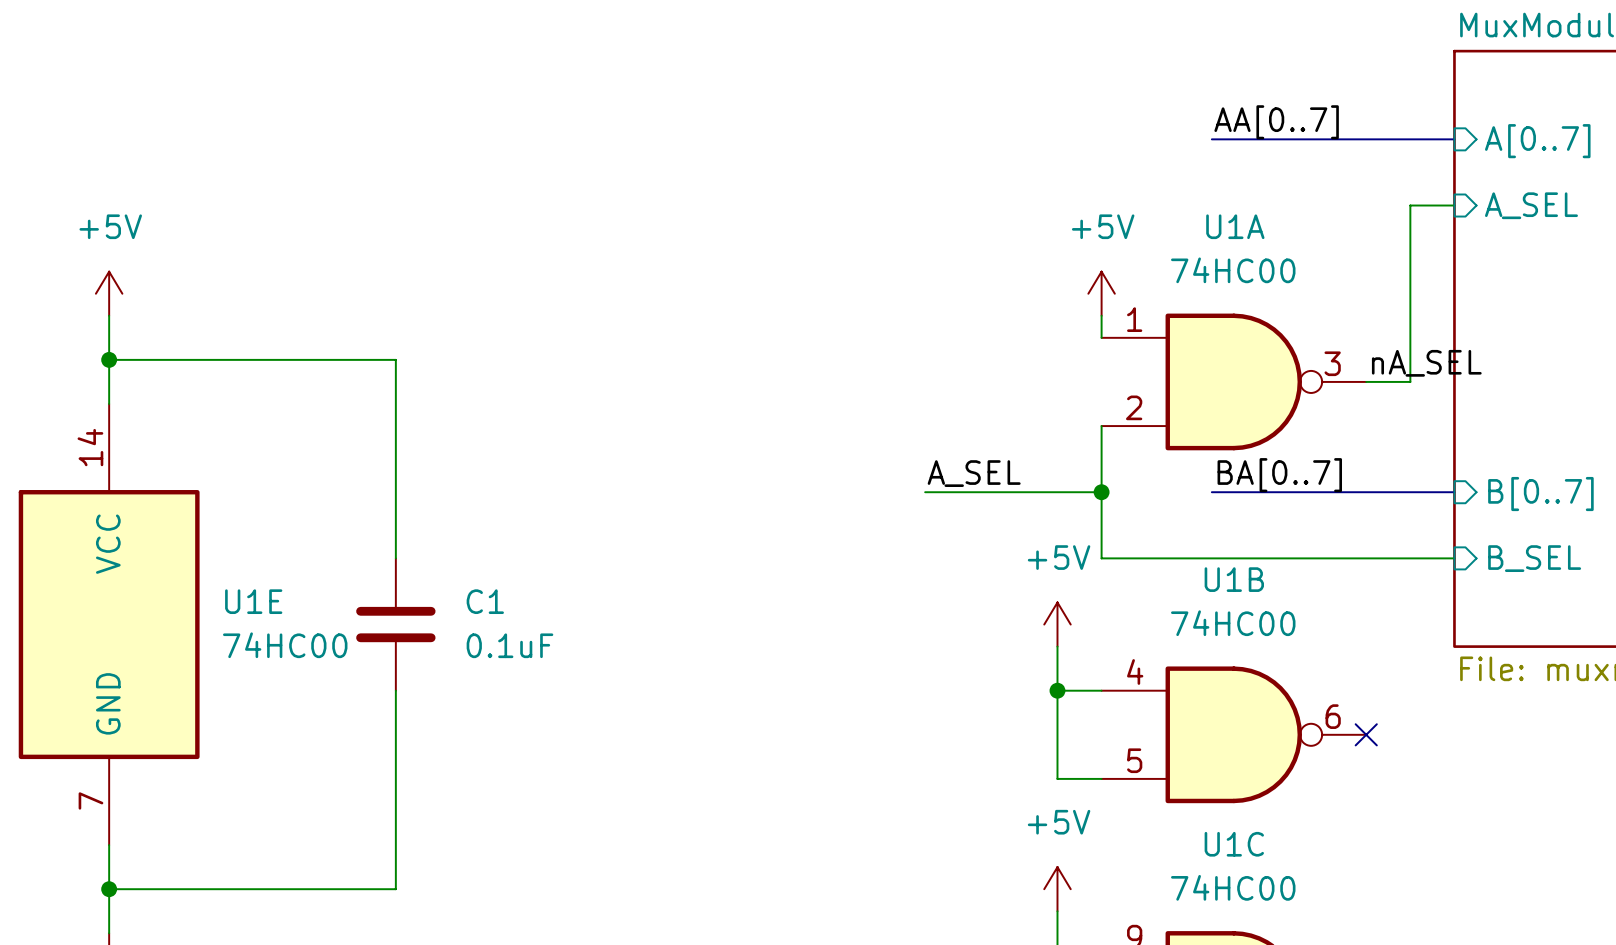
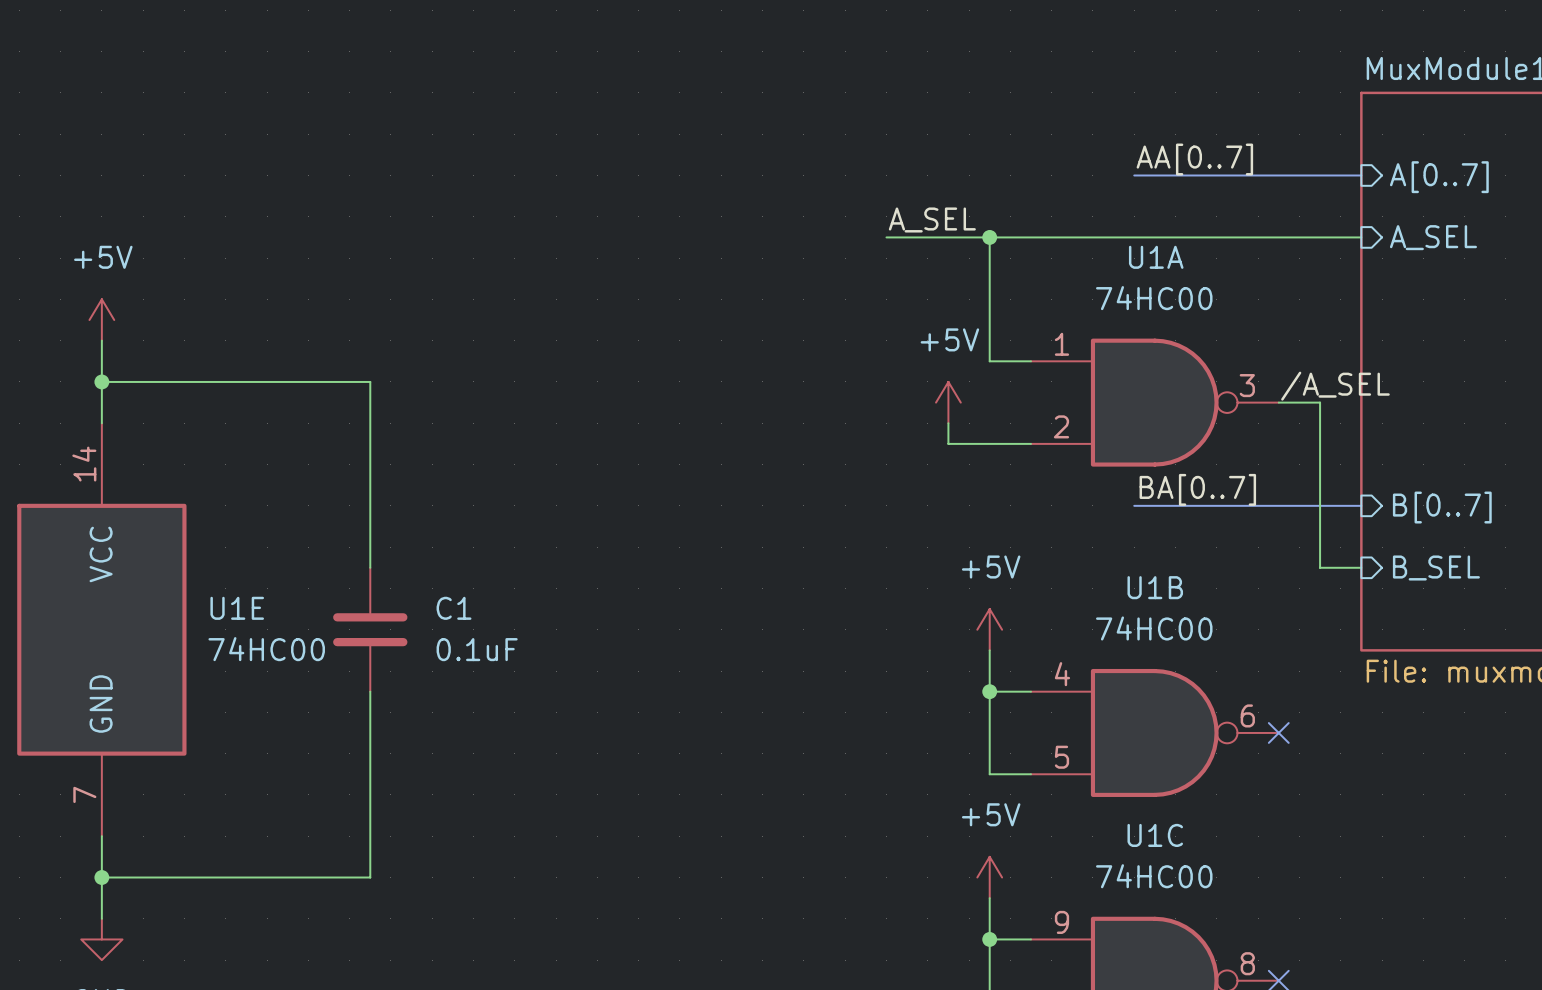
junction: none -> (989, 237)
wire: (1410, 205) (1410, 381) -> (1320, 237) (886, 237)
power symbol position: +5V (1101, 293) -> +5V (948, 402)
wire: (1101, 315) (1101, 337) -> (989, 237) (989, 361) (1031, 361)
label: nA_SEL (1426, 363) -> /A_SEL (1335, 386)
wire: none -> (948, 423) (948, 443) (1031, 443)
wire: (1101, 426) (1101, 558) (1410, 558) -> (1320, 402) (1320, 567)
label position: A_SEL (974, 473) -> A_SEL (932, 219)
wire: (925, 492) (1101, 492) -> none
junction: (1101, 492) -> none

